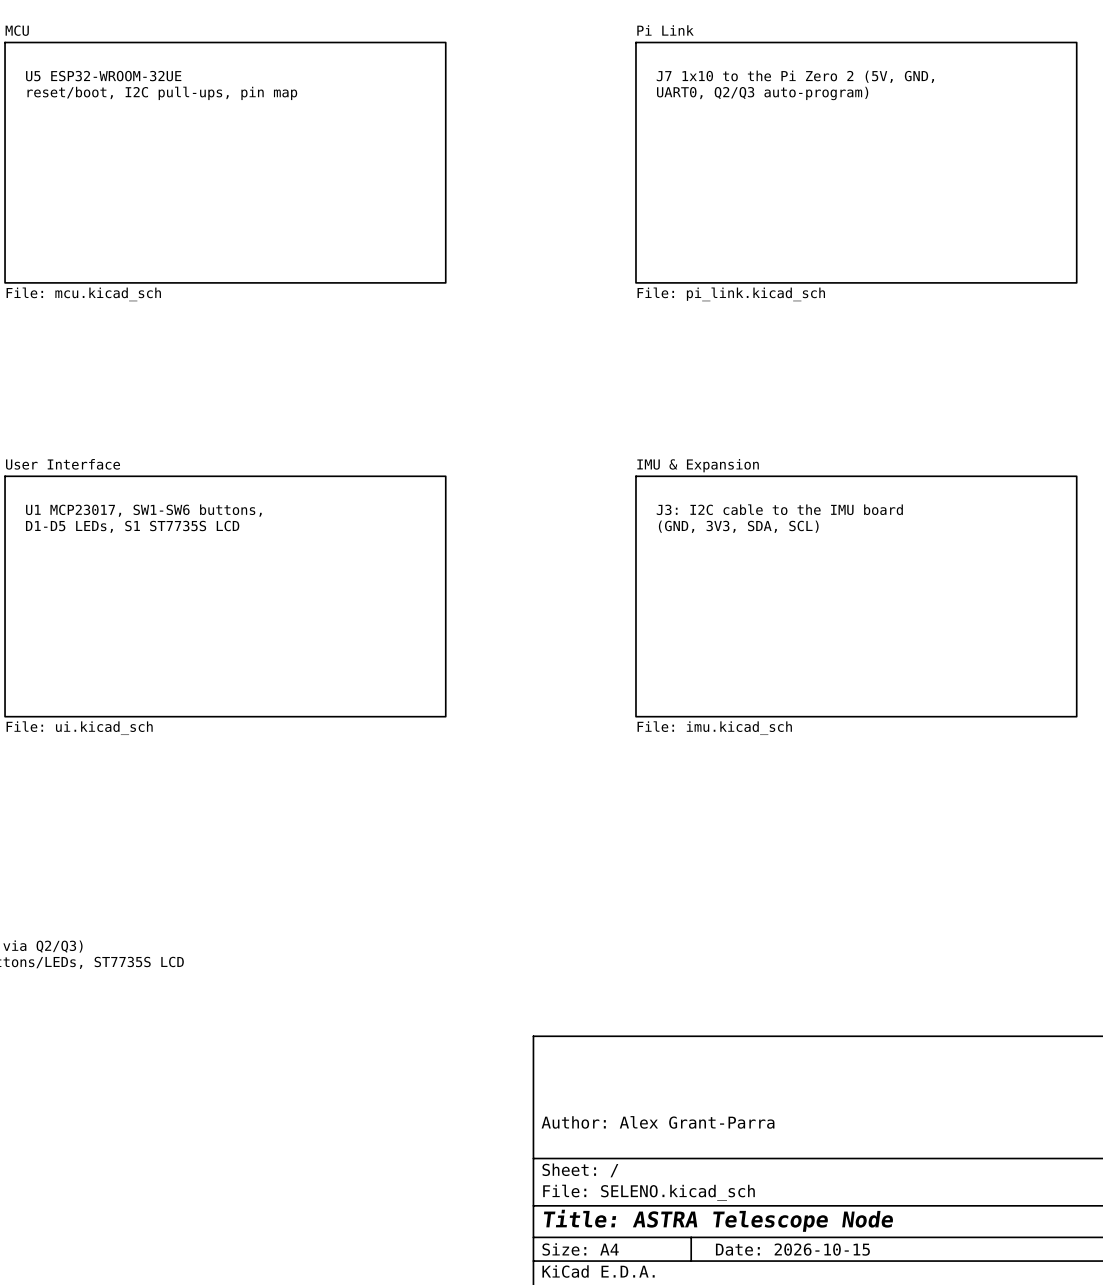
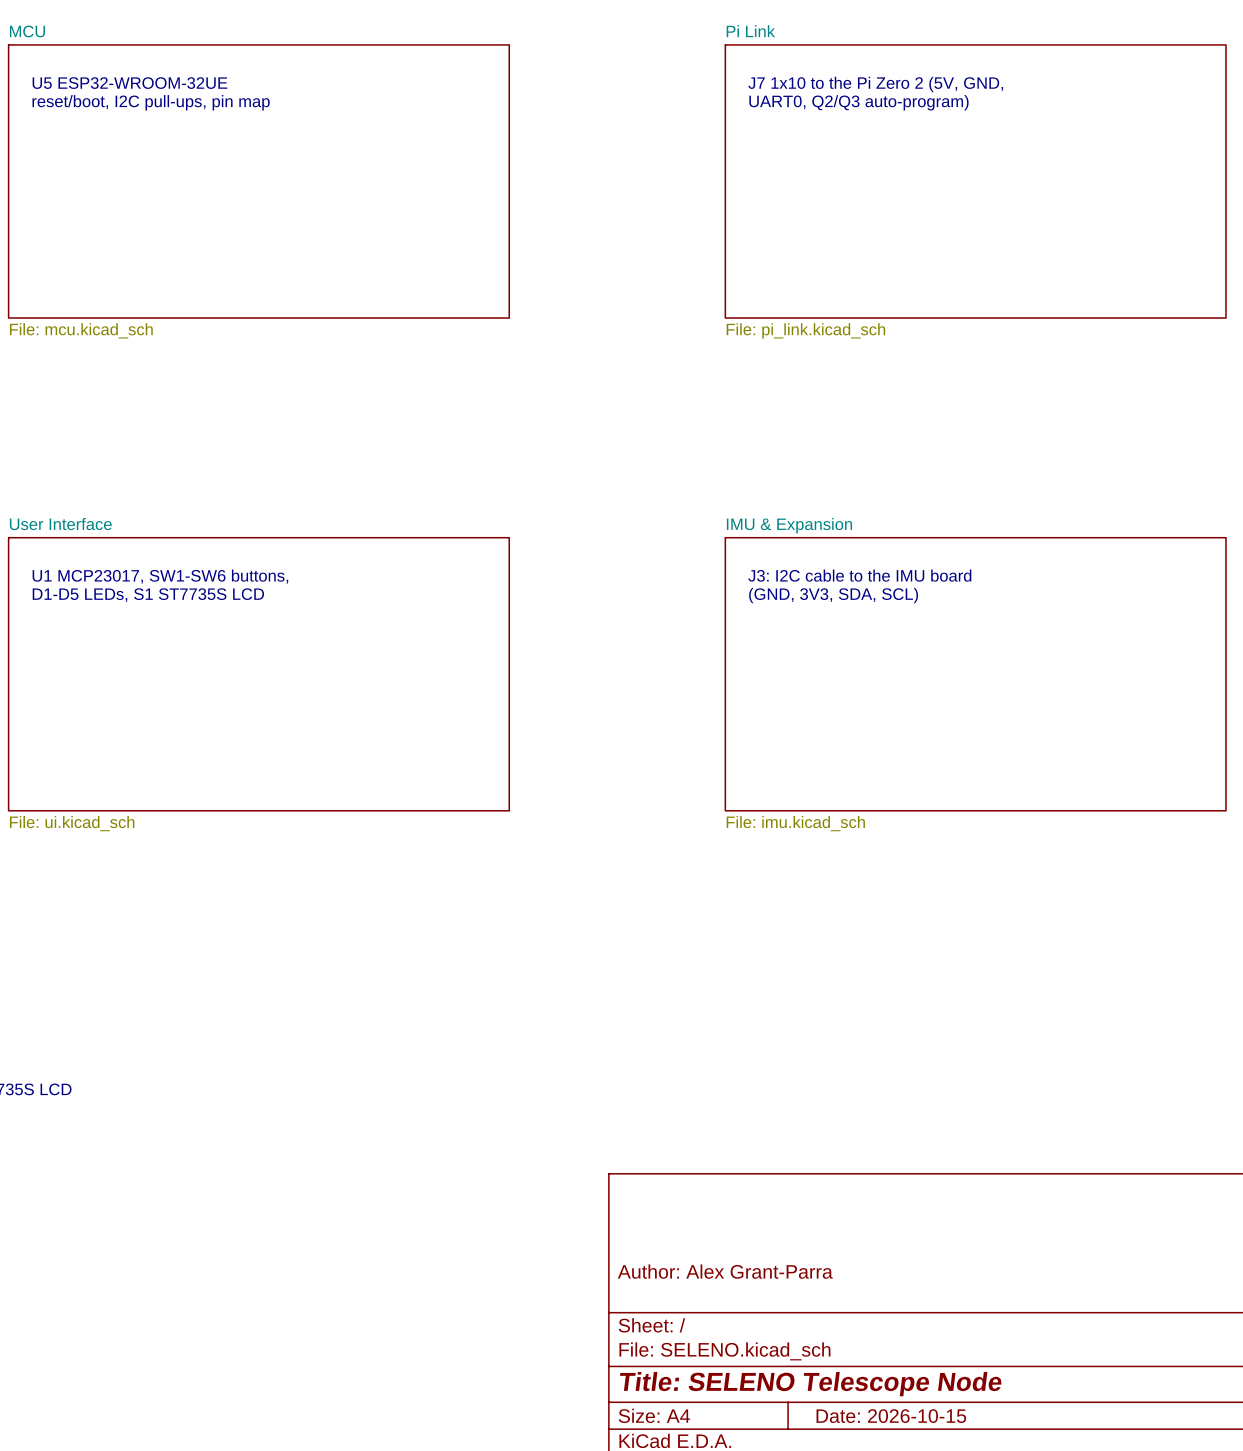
title block: Title: ASTRA Telescope Node (718, 1220) -> Title: SELENO Telescope Node (810, 1384)

